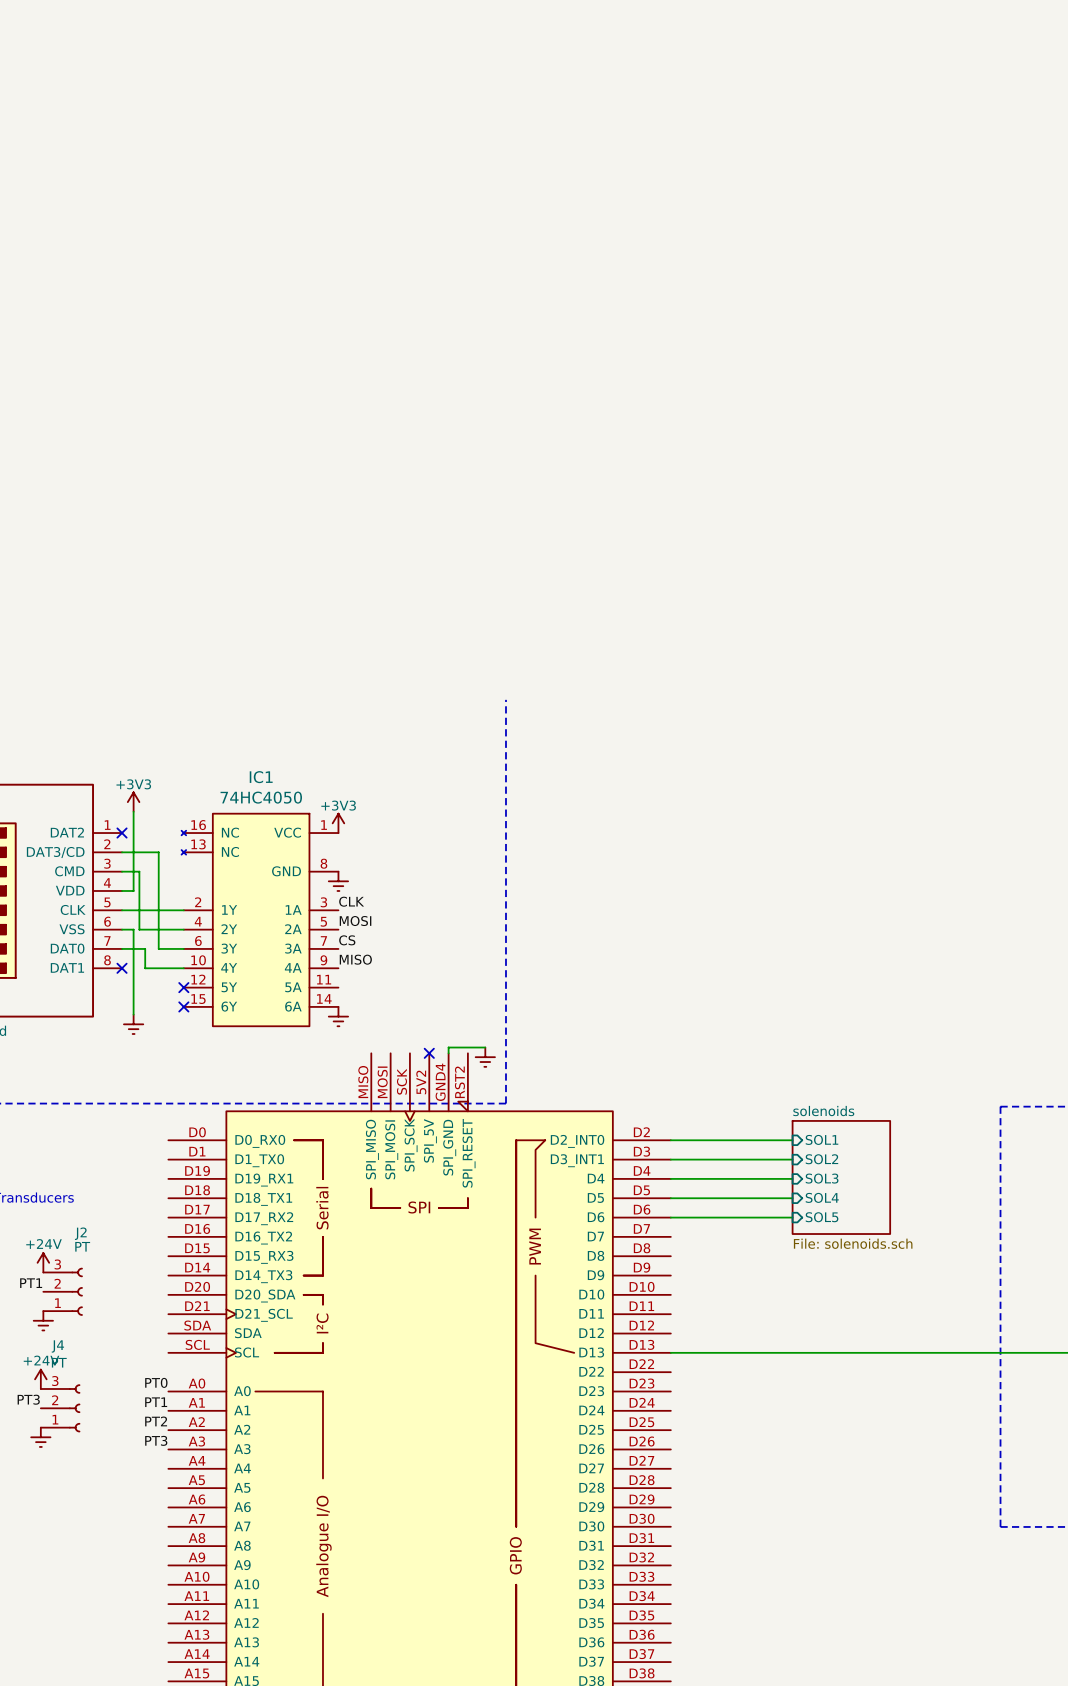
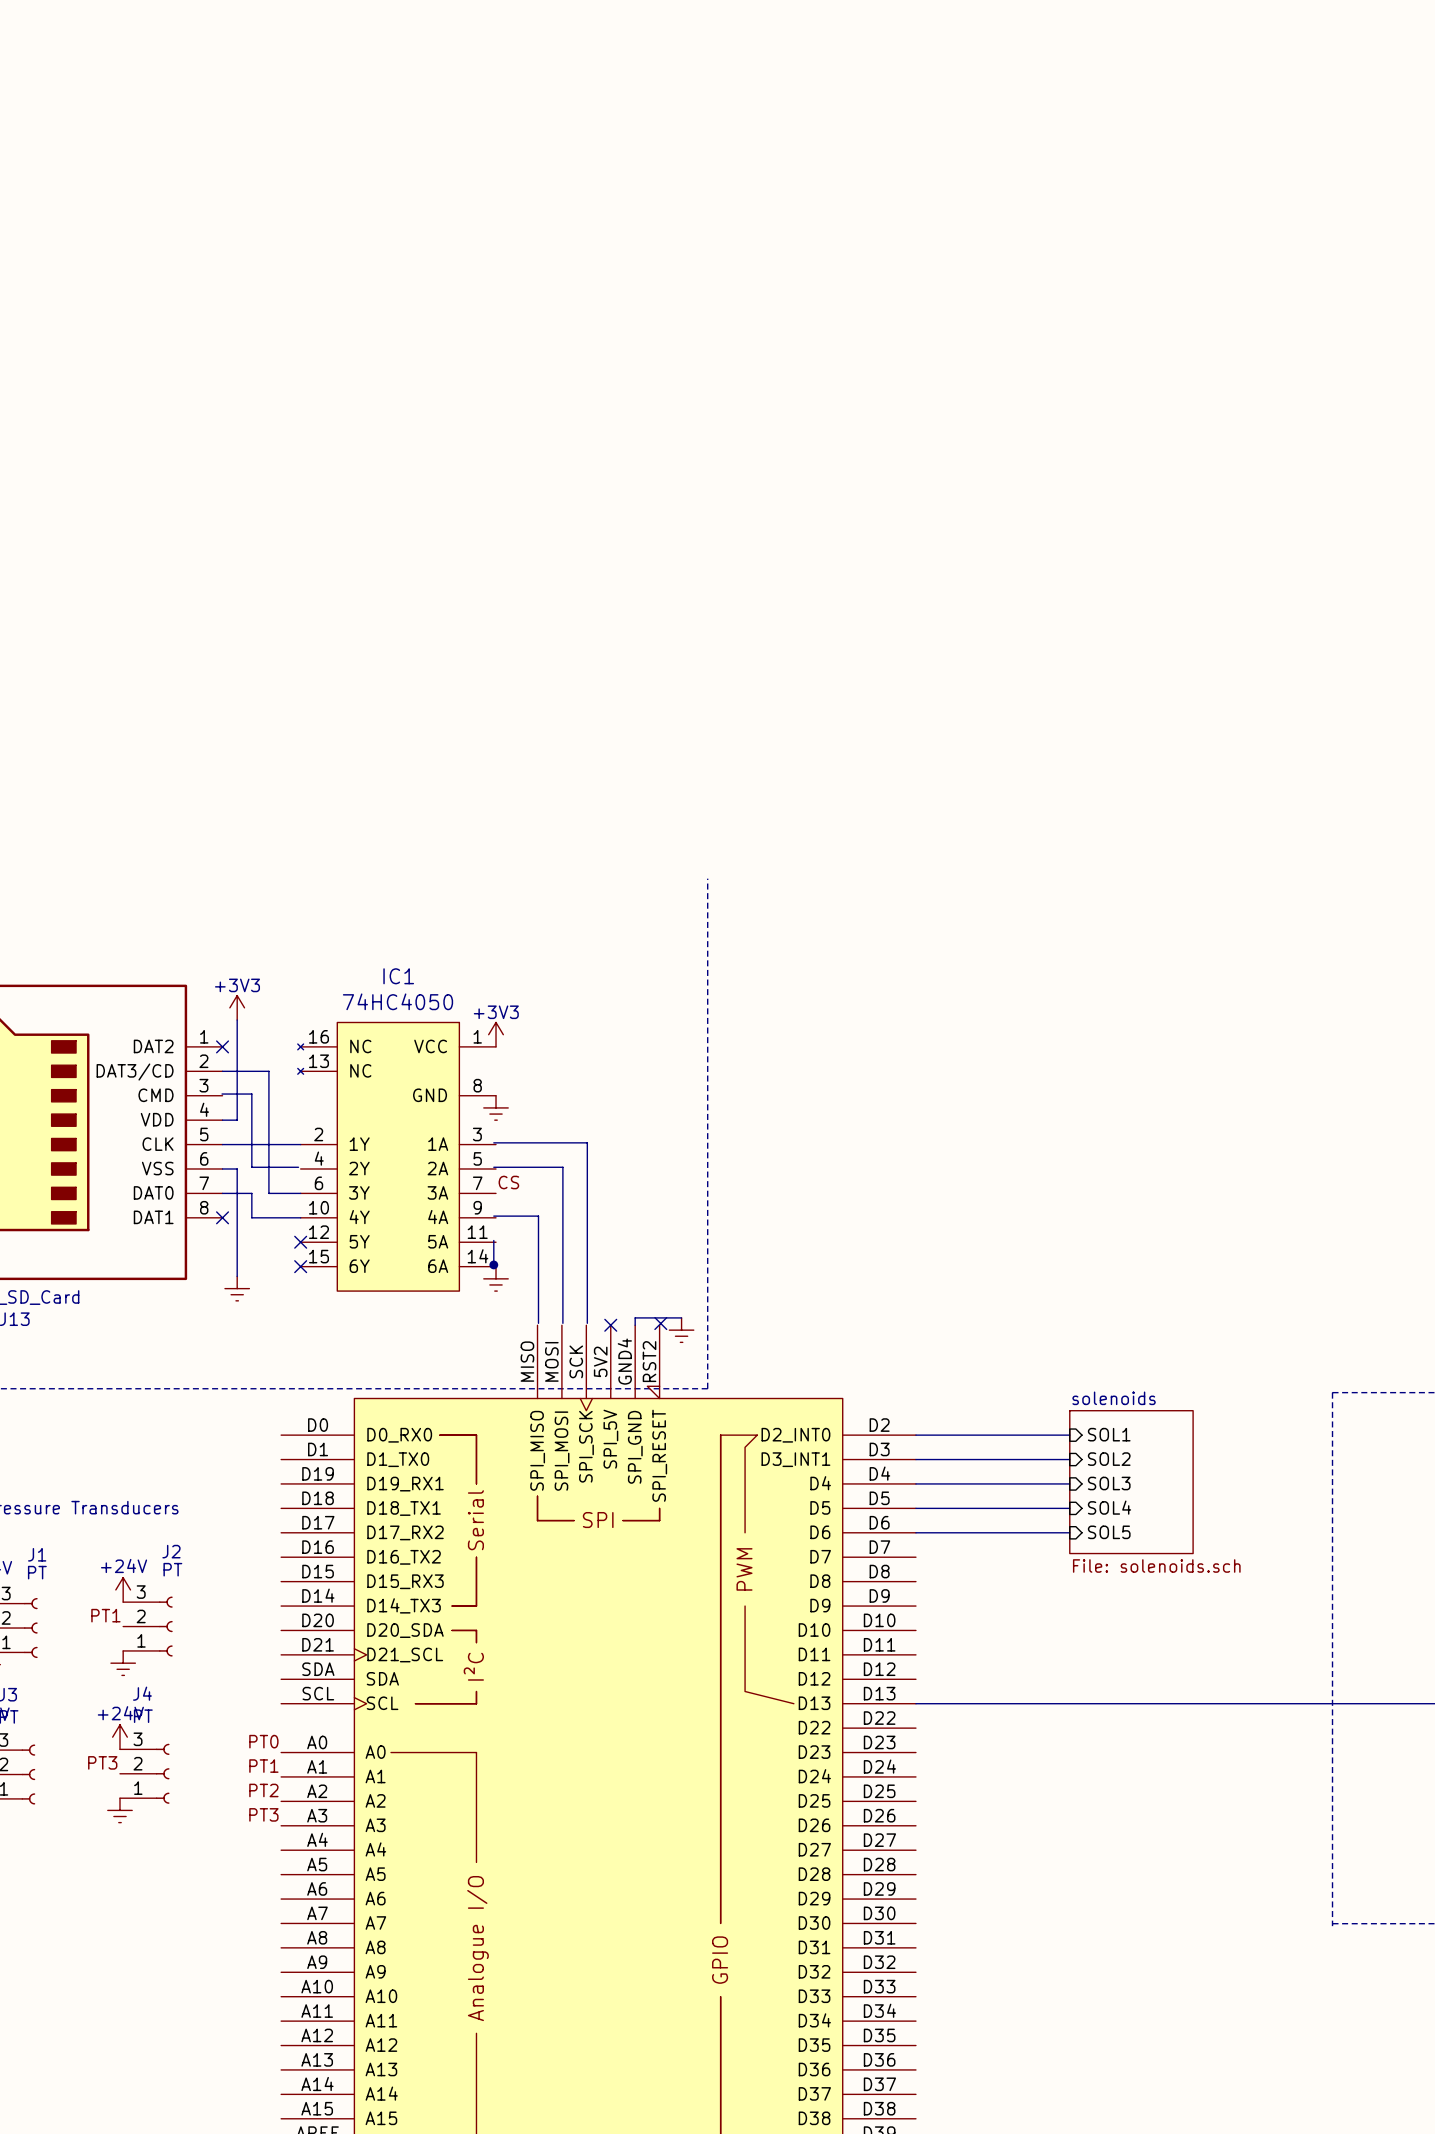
wire: none -> (222, 1094) (251, 1094) (251, 1167) (298, 1167)
wire: (122, 871) (139, 871) (139, 929) (183, 929) -> none
label: CLK (351, 901) -> none
wire: none -> (493, 1142) (587, 1142) (587, 1323)
label: MOSI (355, 921) -> none
wire: none -> (493, 1167) (562, 1167) (562, 1323)
label: MISO (355, 959) -> none
wire: none -> (493, 1216) (538, 1216) (538, 1323)
wire: none -> (493, 1240) (493, 1264)
junction: none -> (493, 1264)
no-connect mark: none -> (660, 1323)

